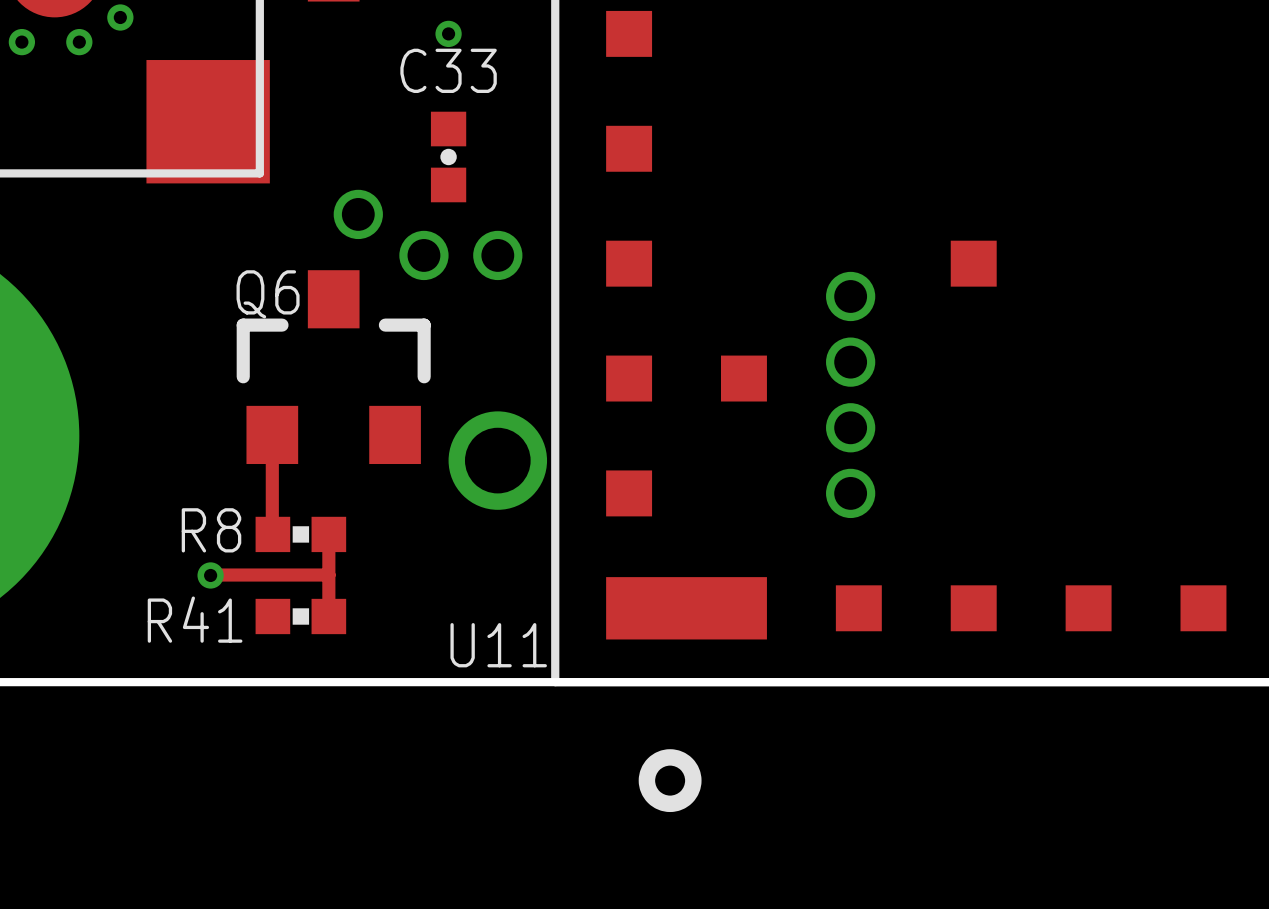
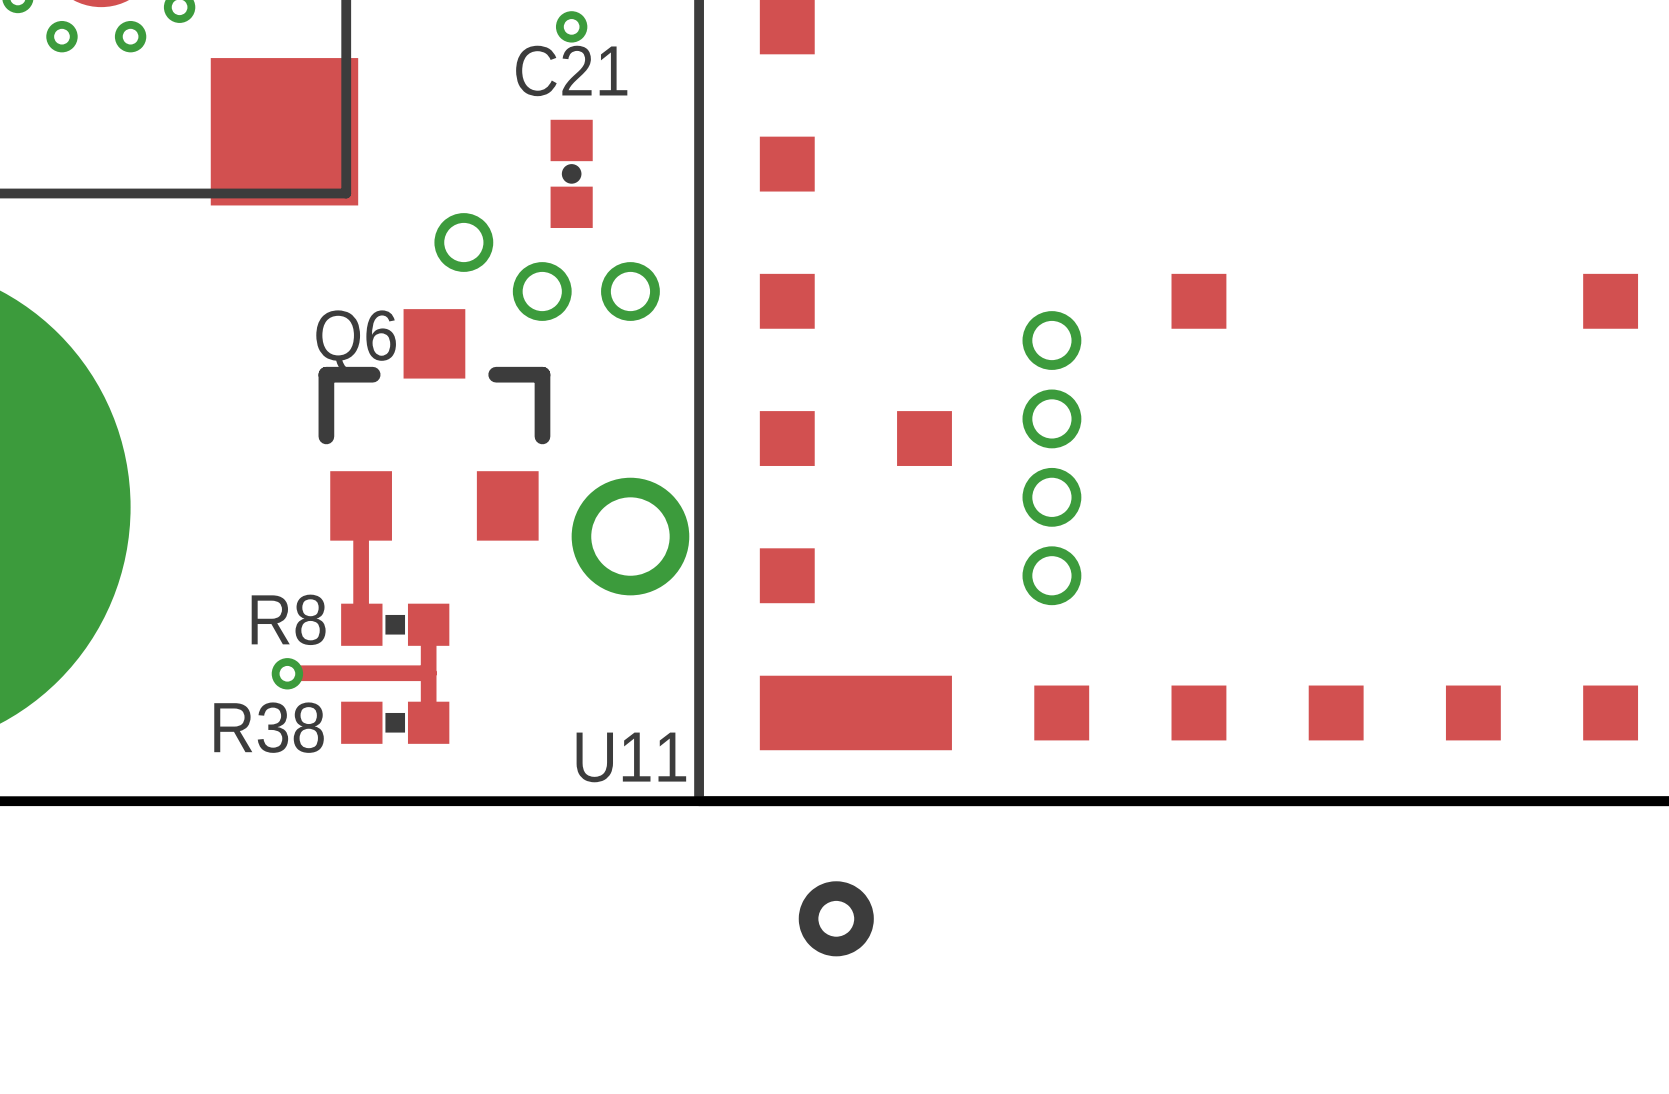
C33 name: C33 (448, 70) -> C21 (571, 70)
R41 name: R41 (195, 619) -> R38 (269, 727)

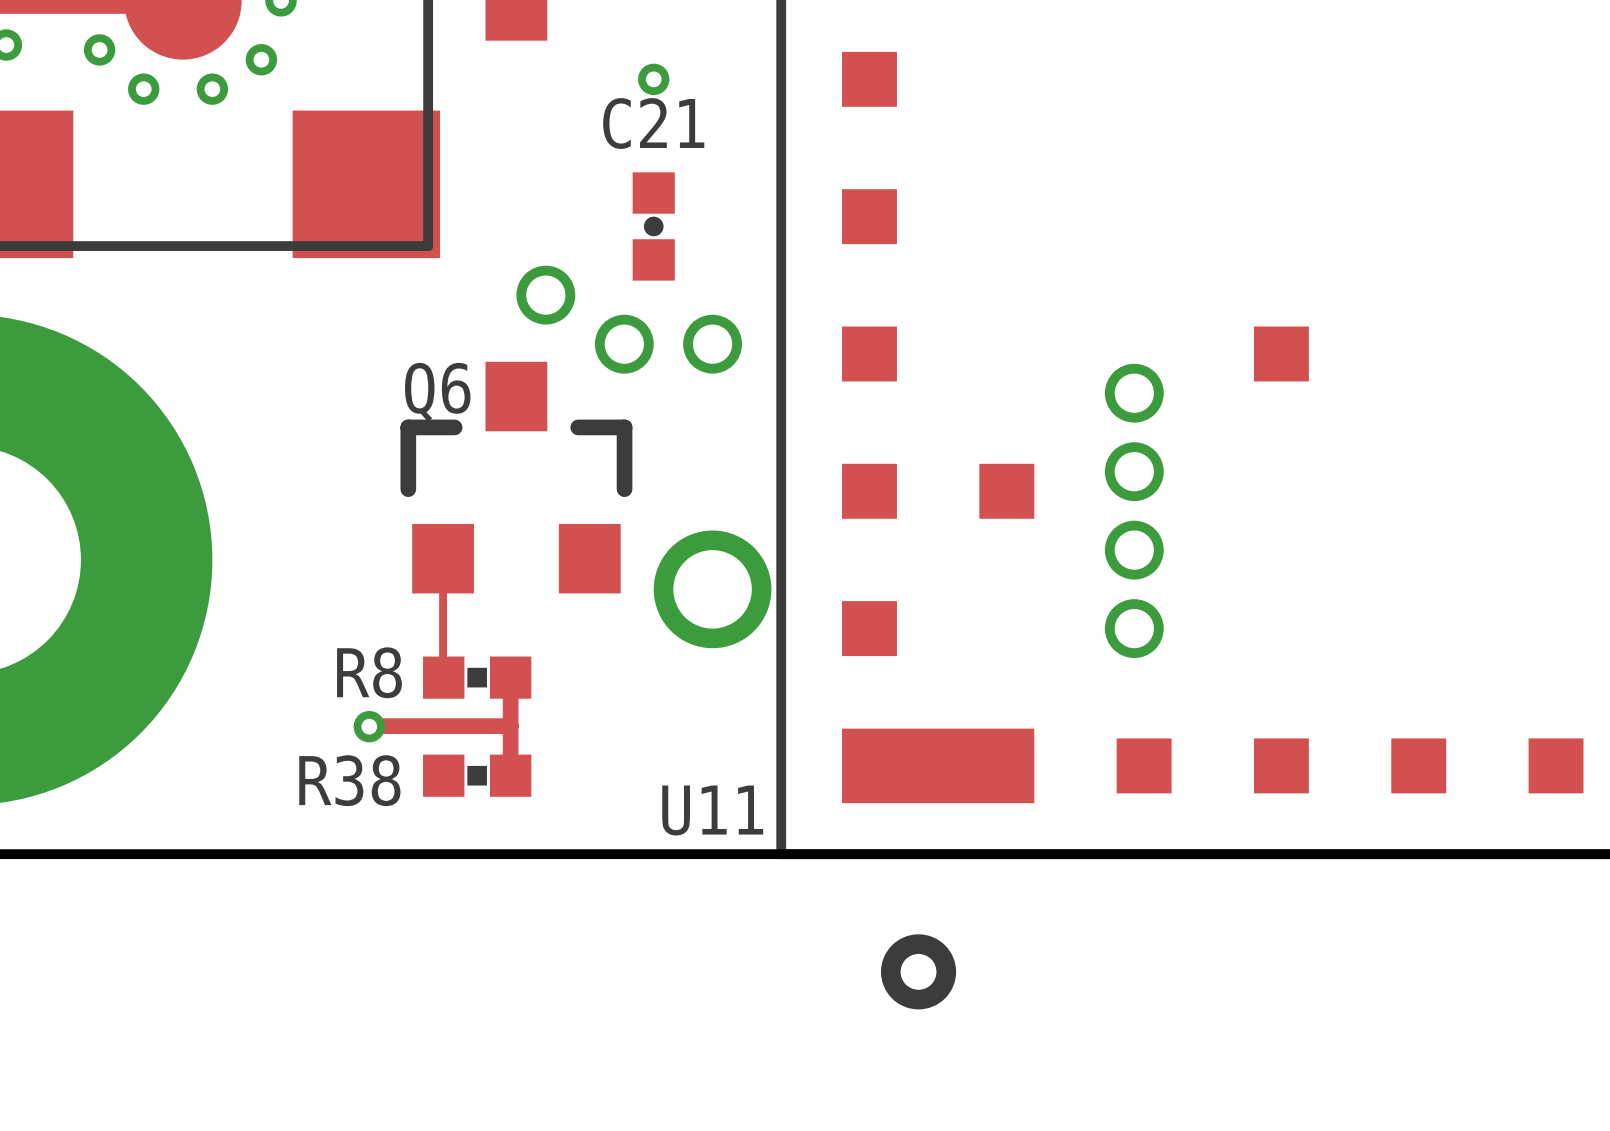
track width: thick (361, 505) (361, 624) -> thin (443, 558) (443, 676)

